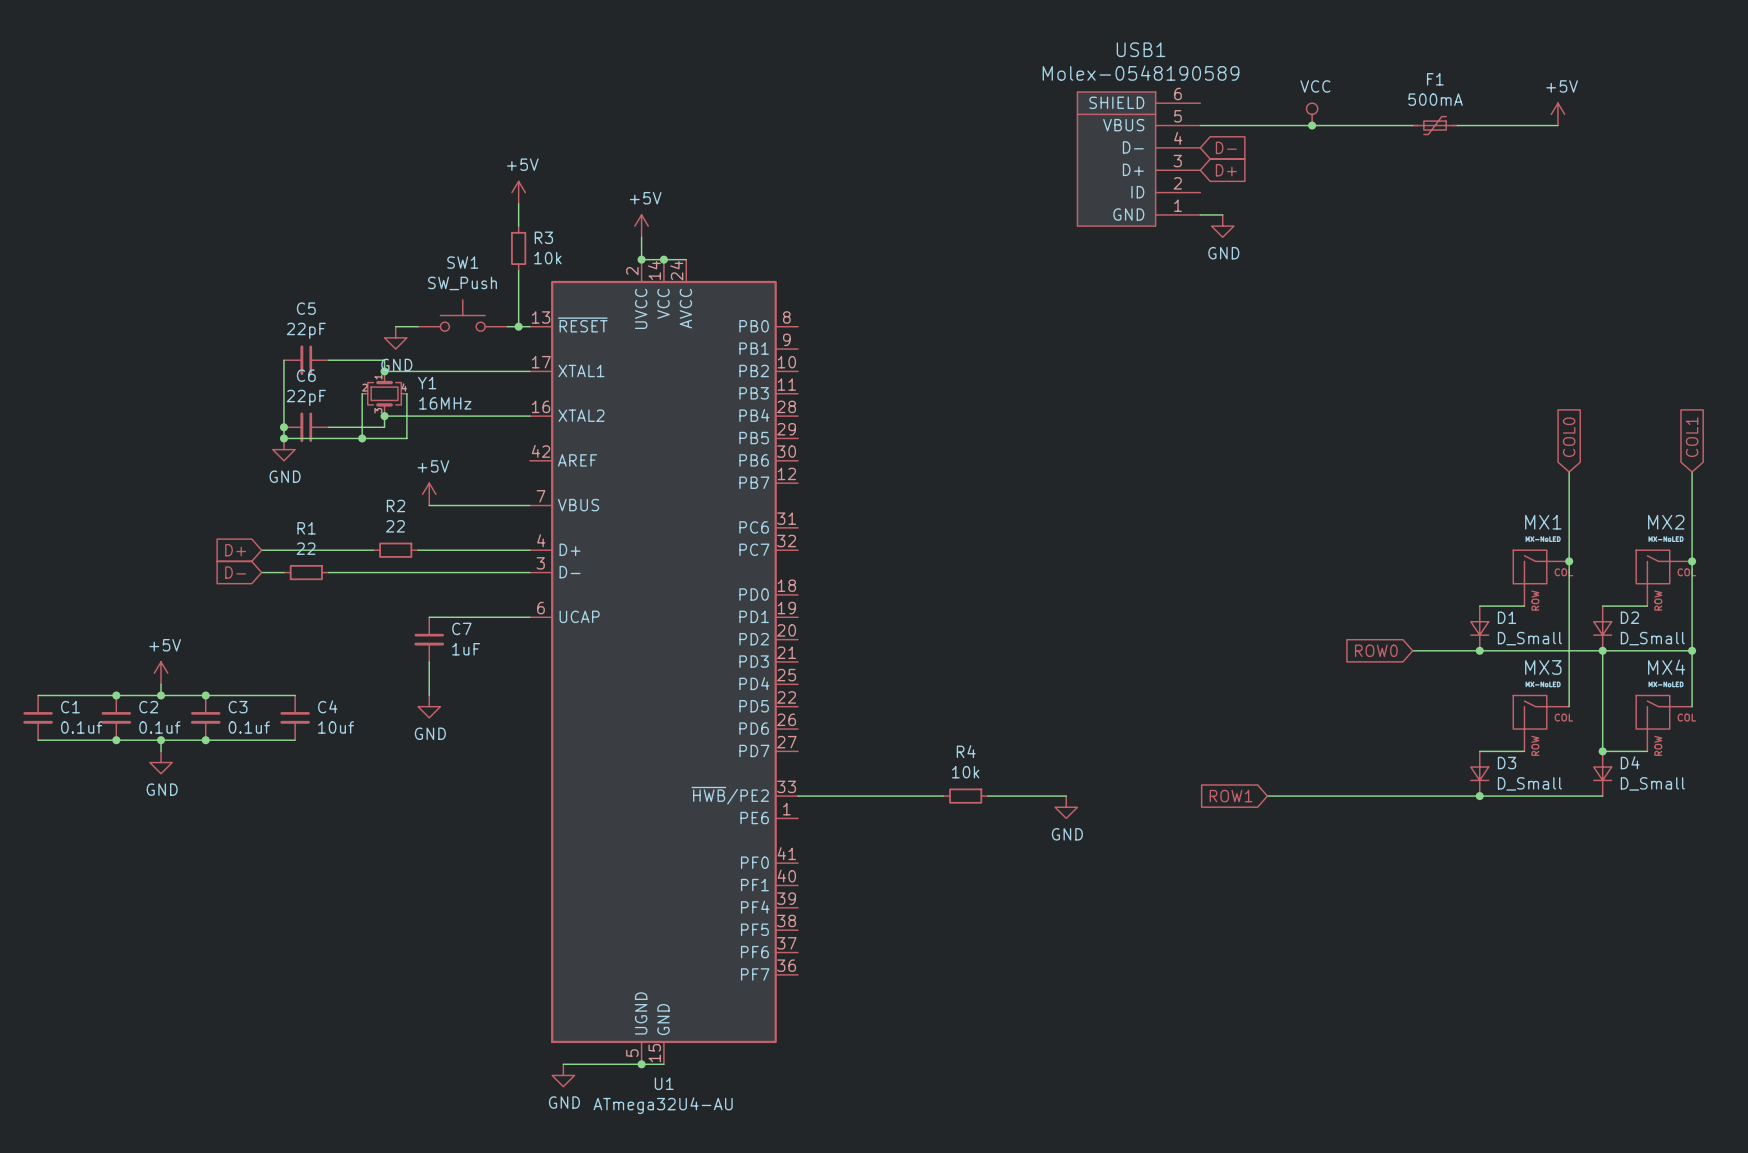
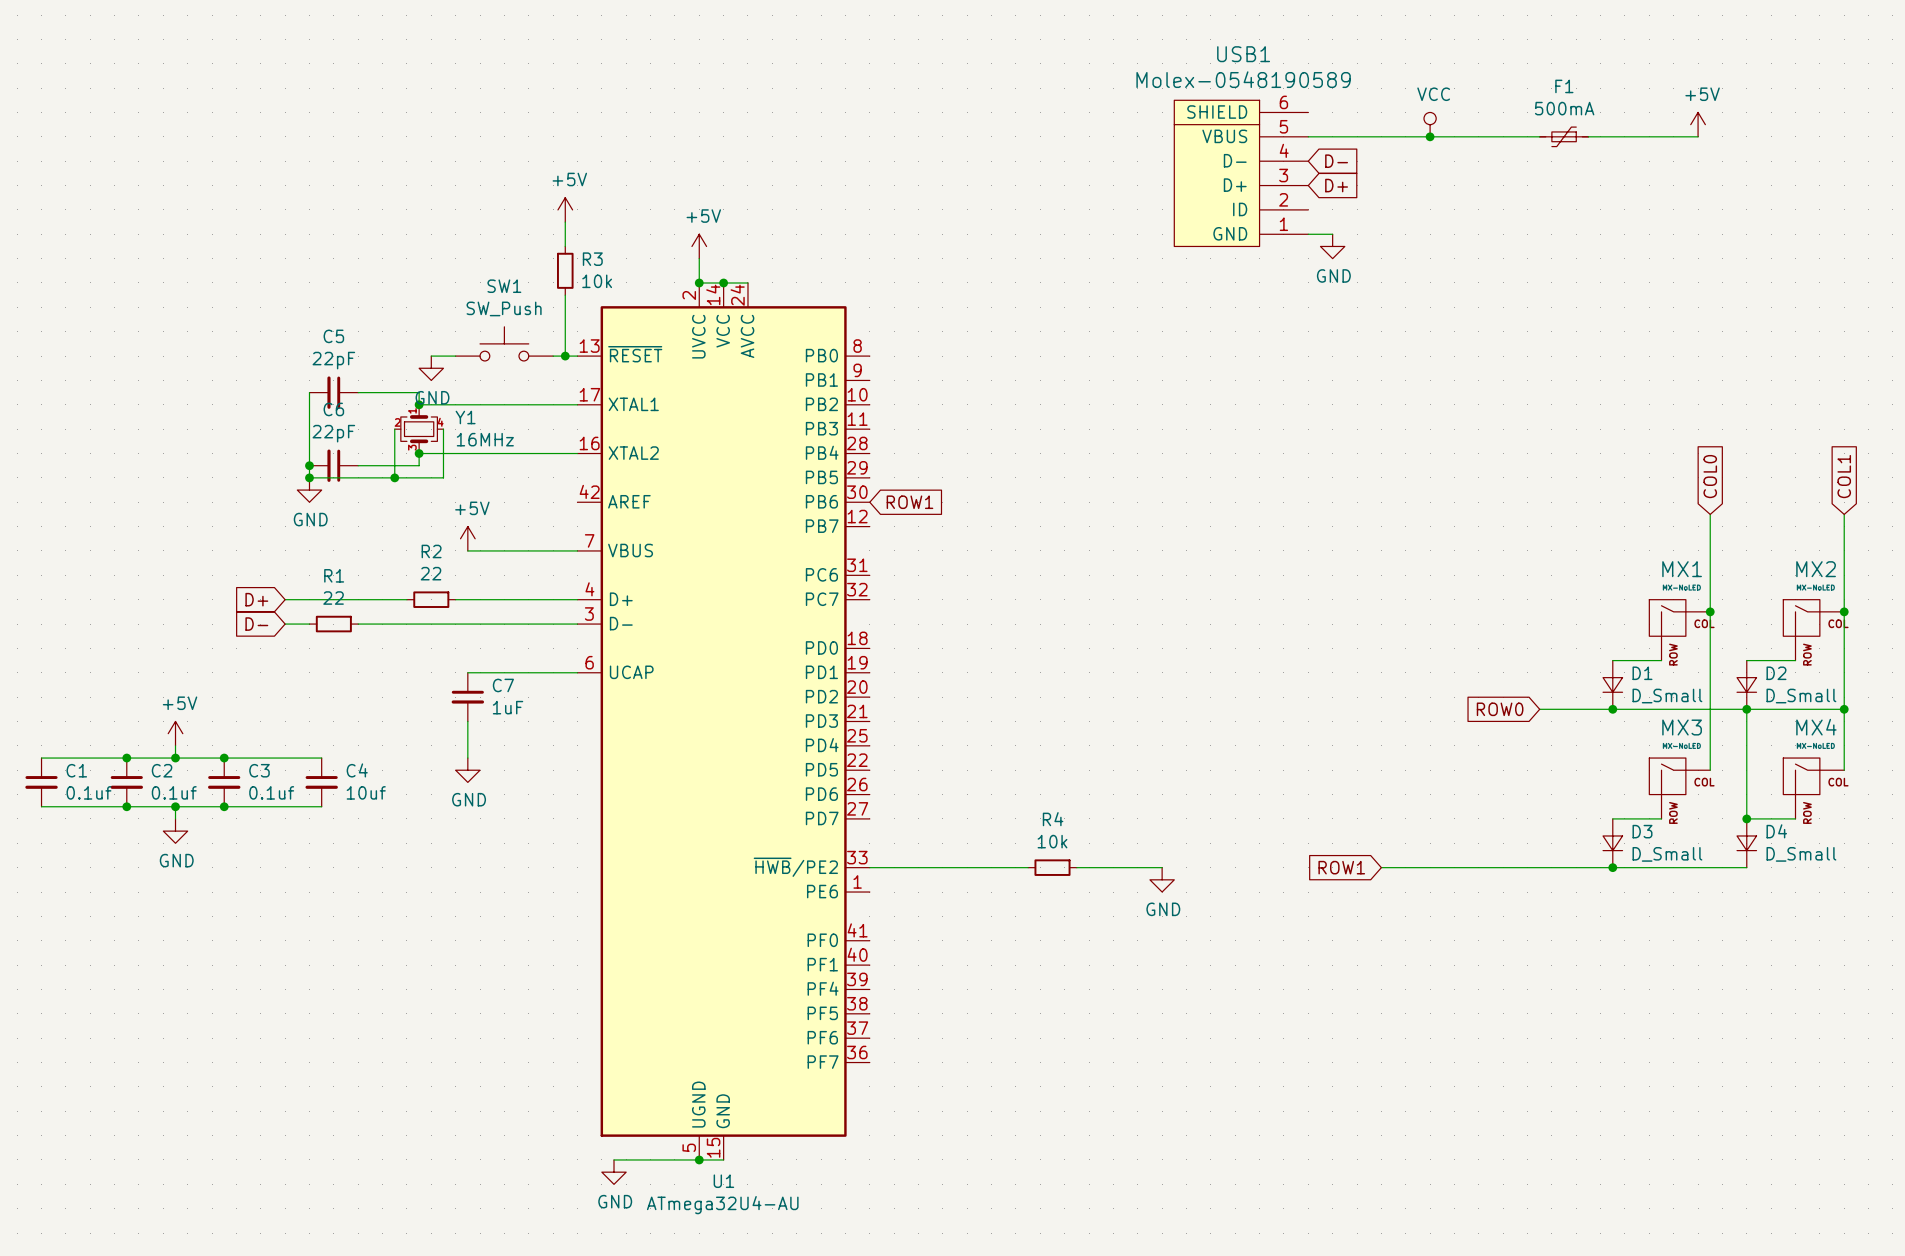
global label: none -> ROW1 (909, 502)

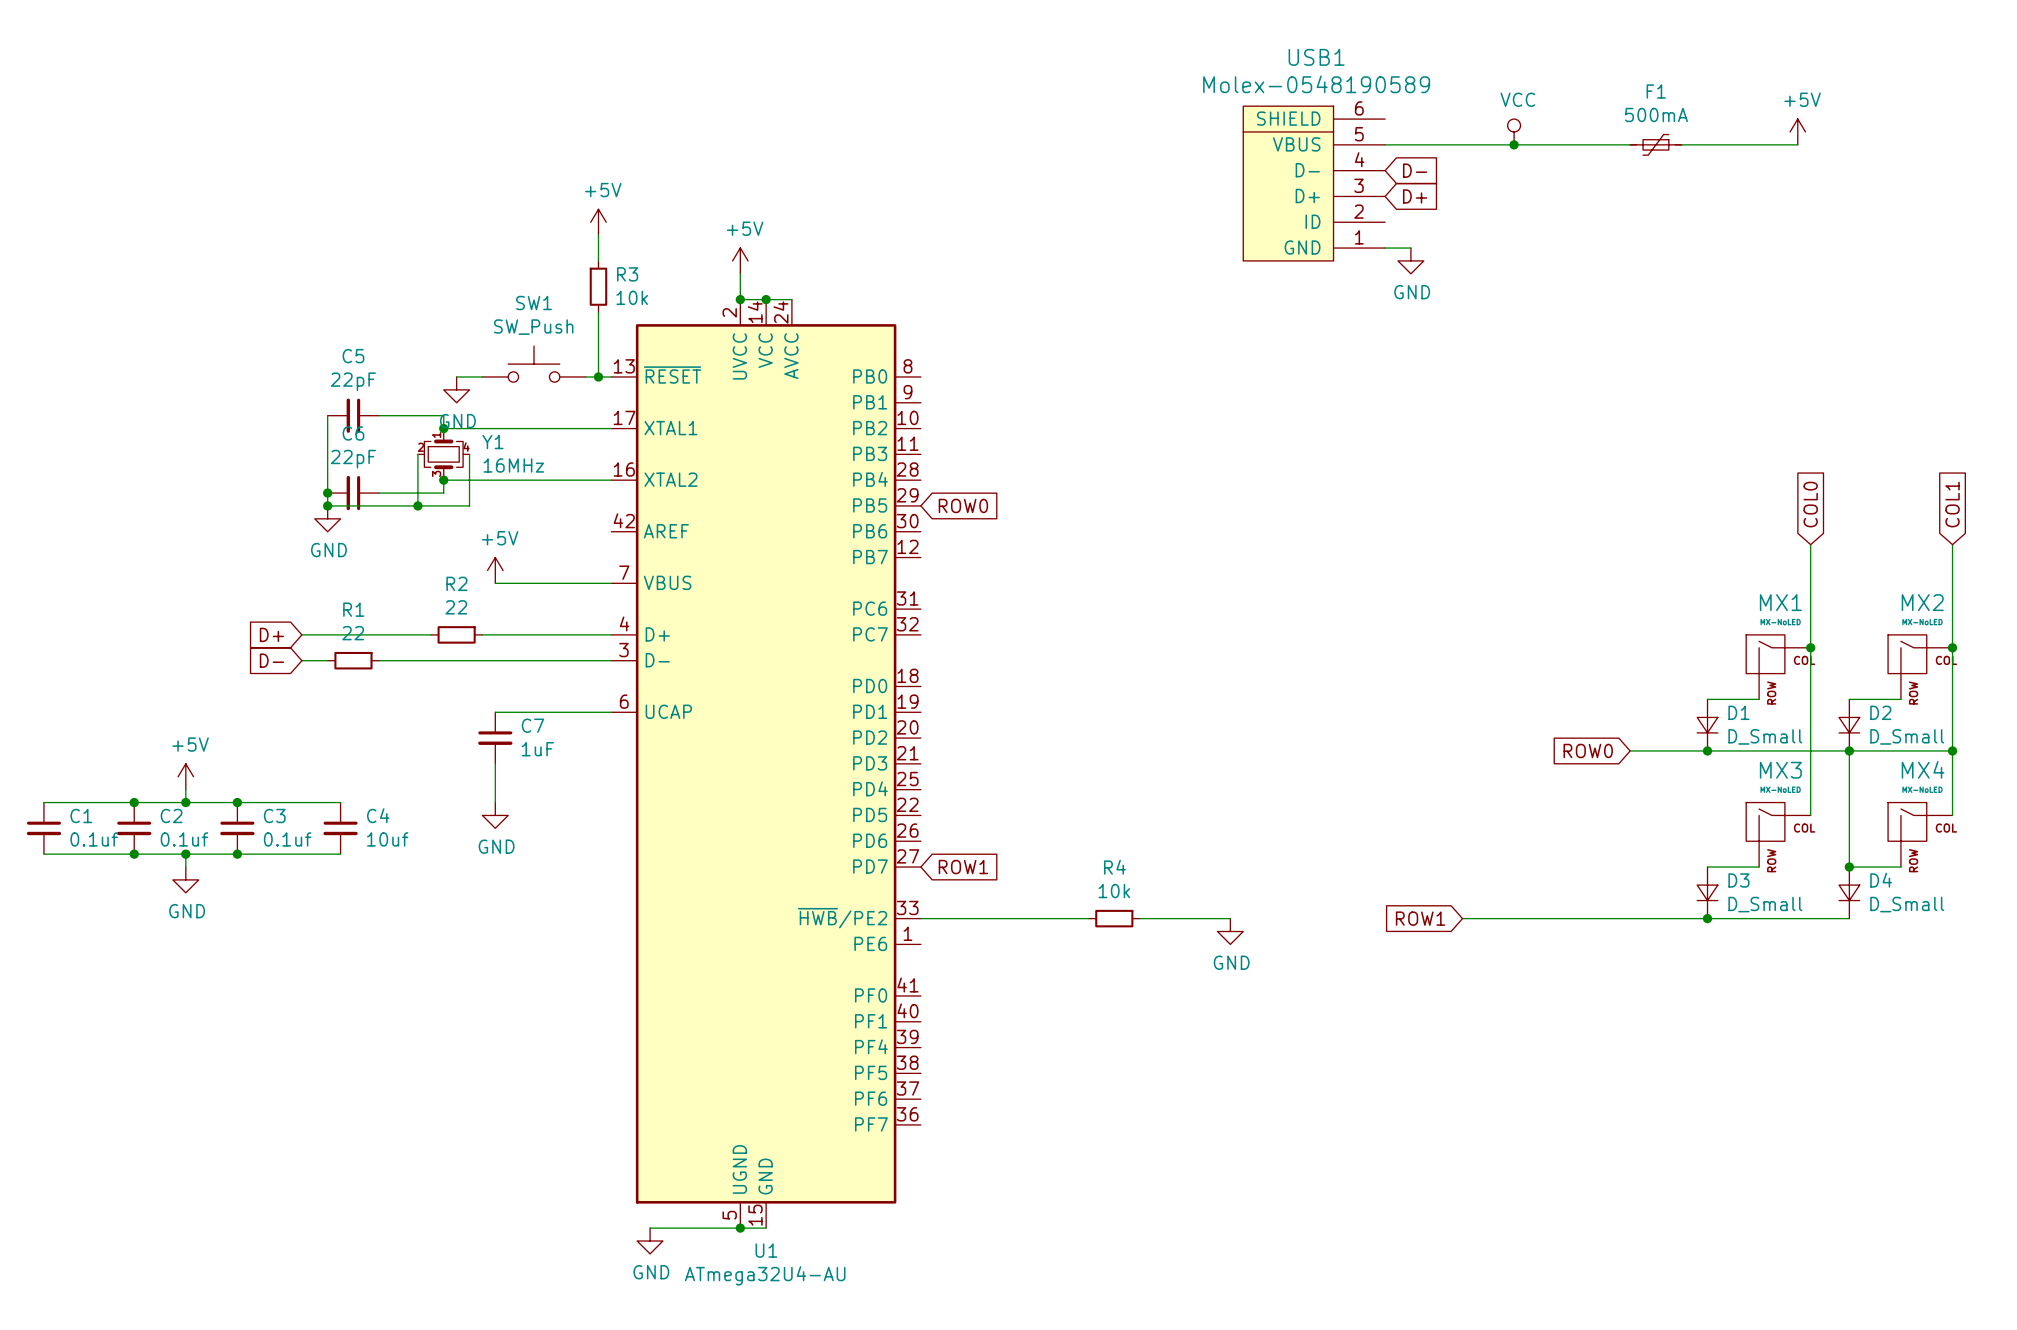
global label: ROW1 (909, 502) -> ROW0 (963, 505)
global label: none -> ROW1 (963, 867)

